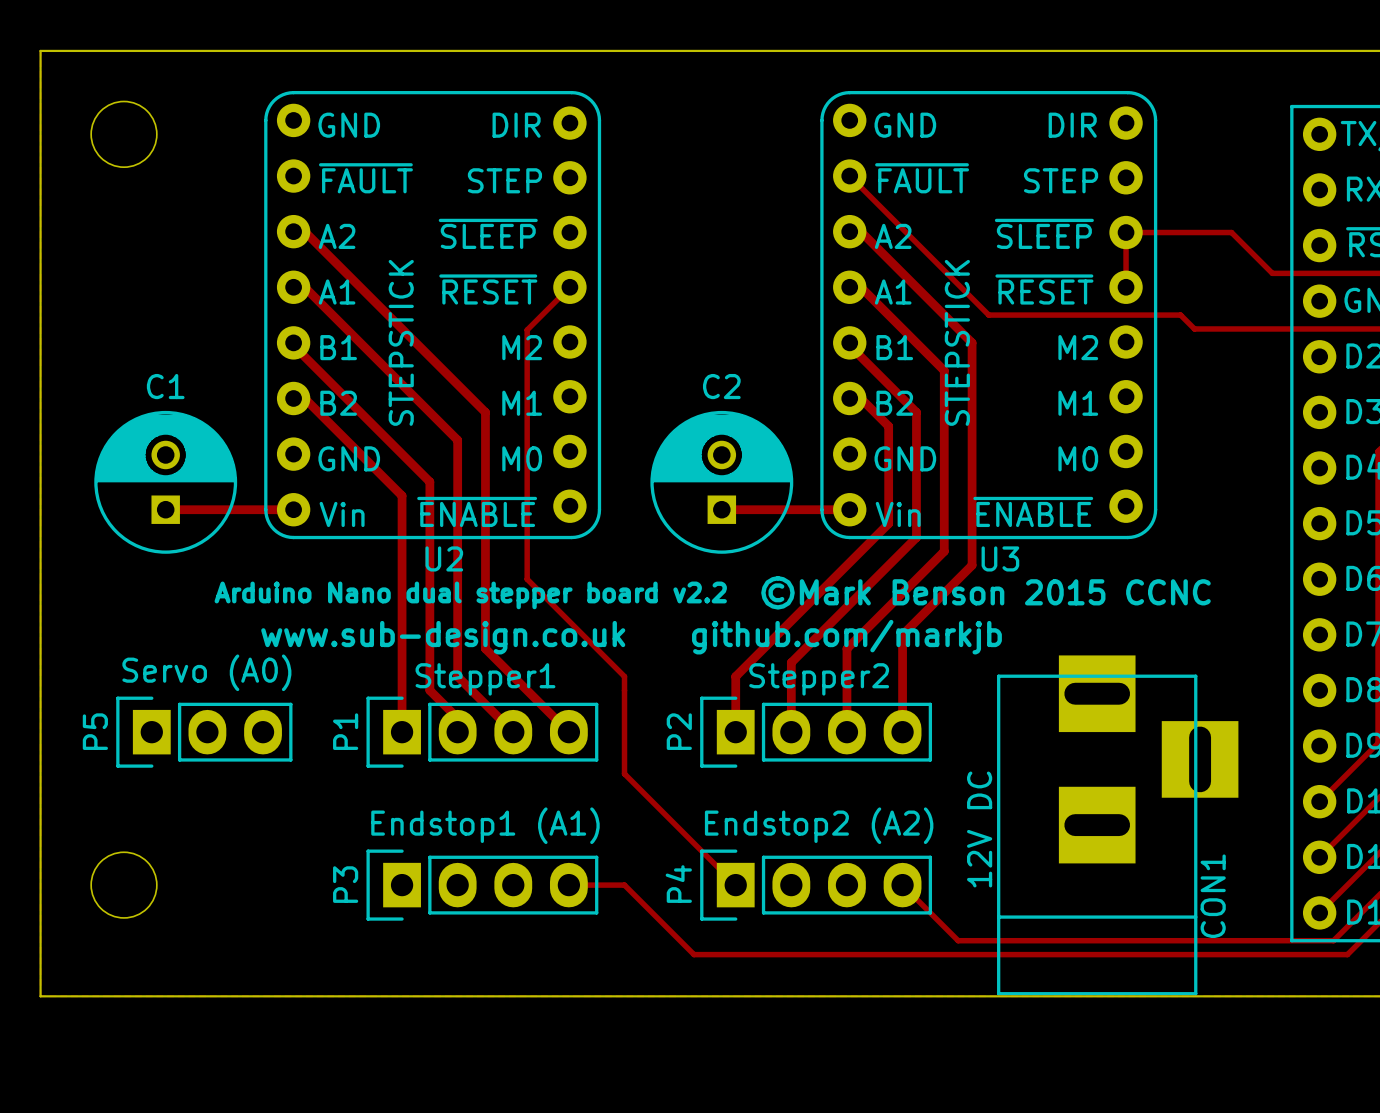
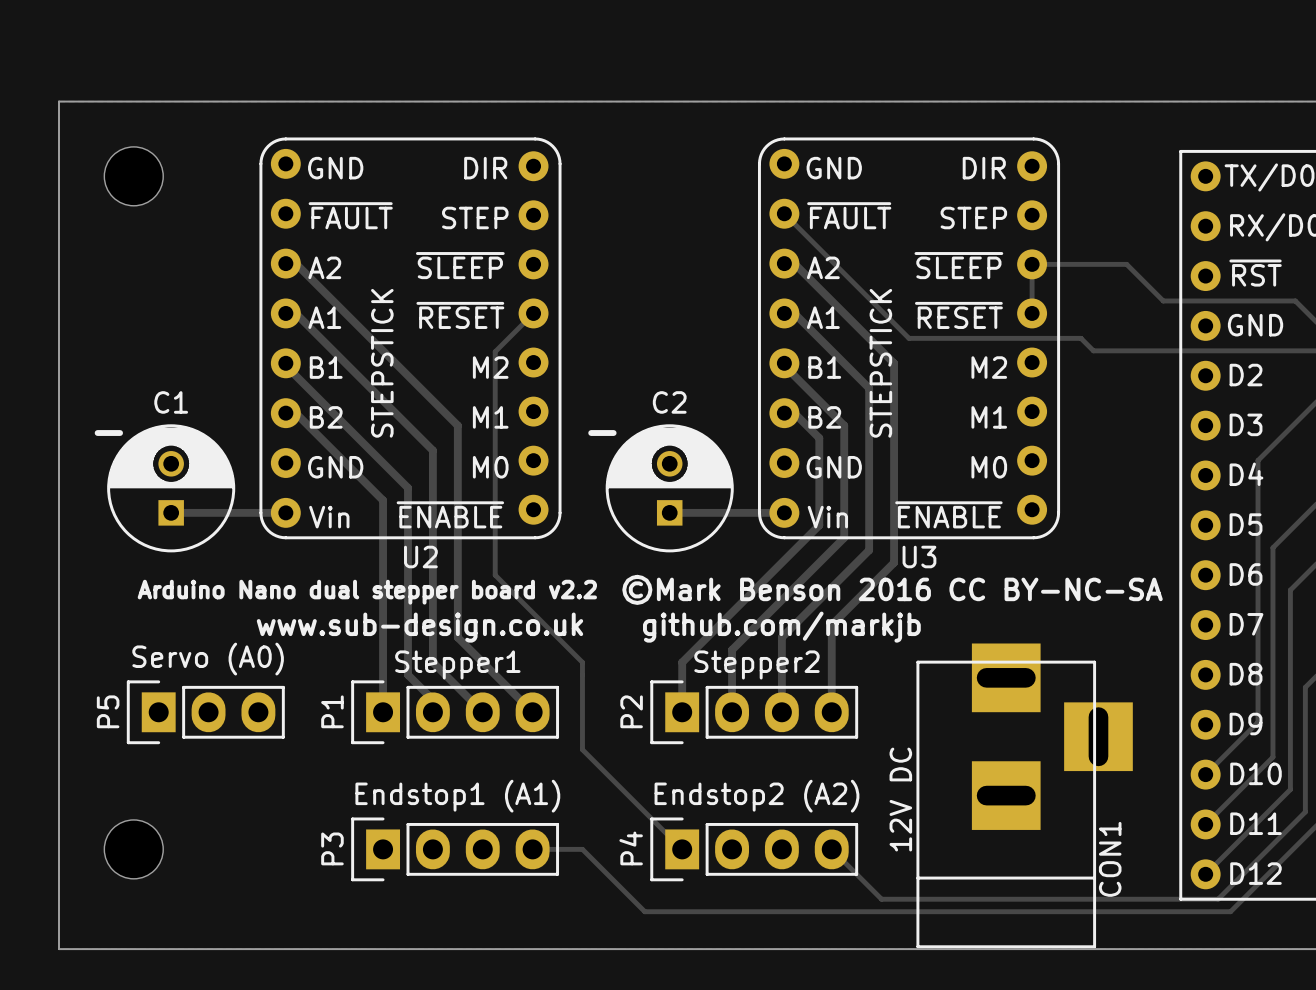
text: none -> - (108, 433)
text: none -> - (602, 433)
text: ©Mark Benson 2015 CCNC (985, 592) -> ©Mark Benson 2016 CC BY-NC-SA (892, 589)
text position: Arduino Nano dual stepper board v2.2 (470, 595) -> Arduino Nano dual stepper board v2.2 (367, 592)

